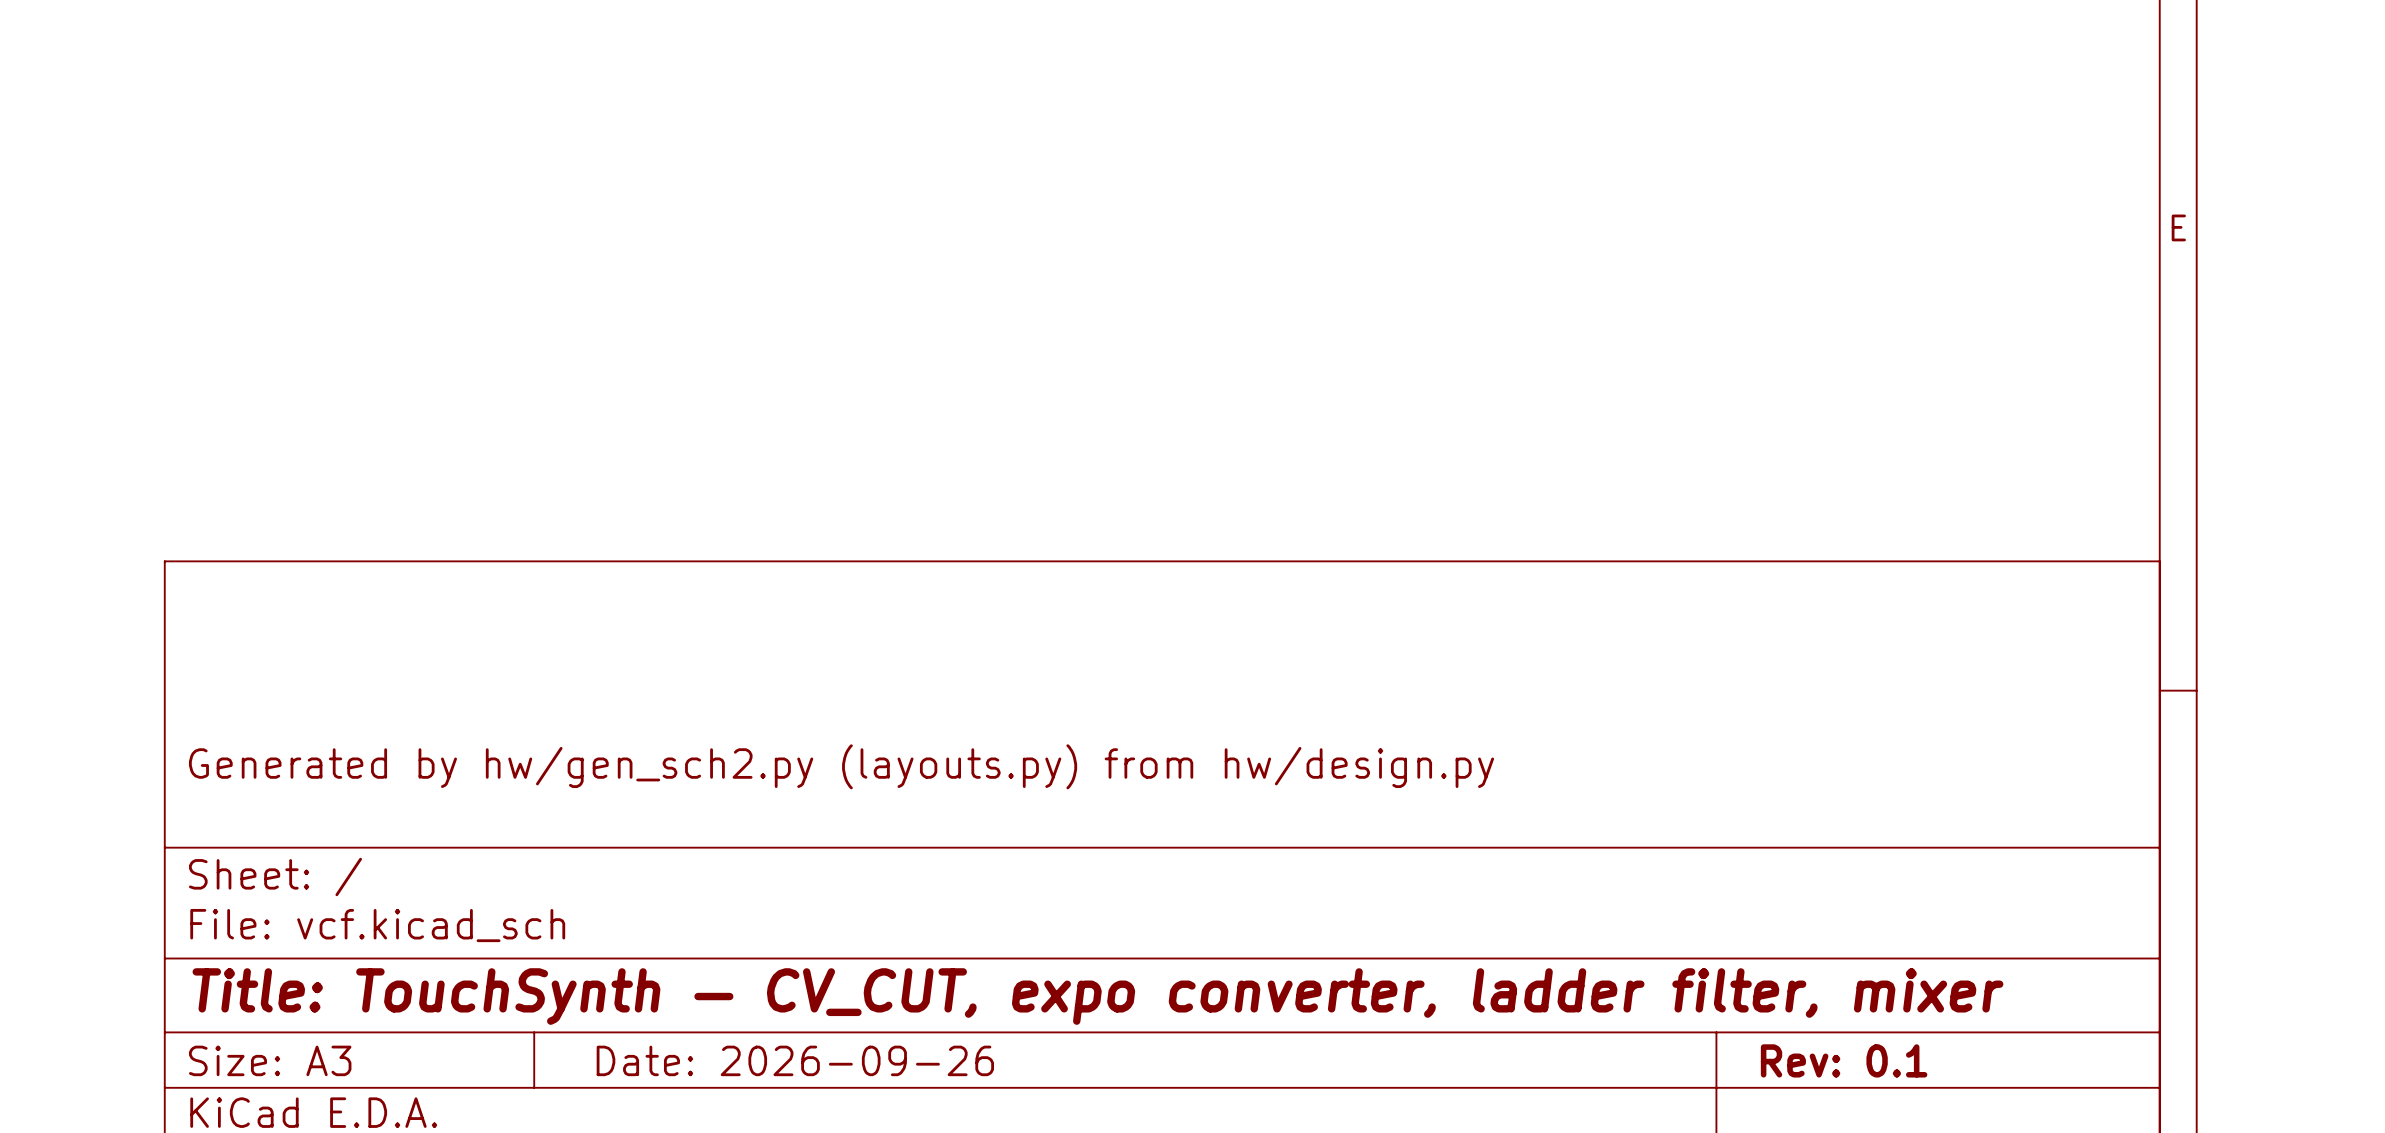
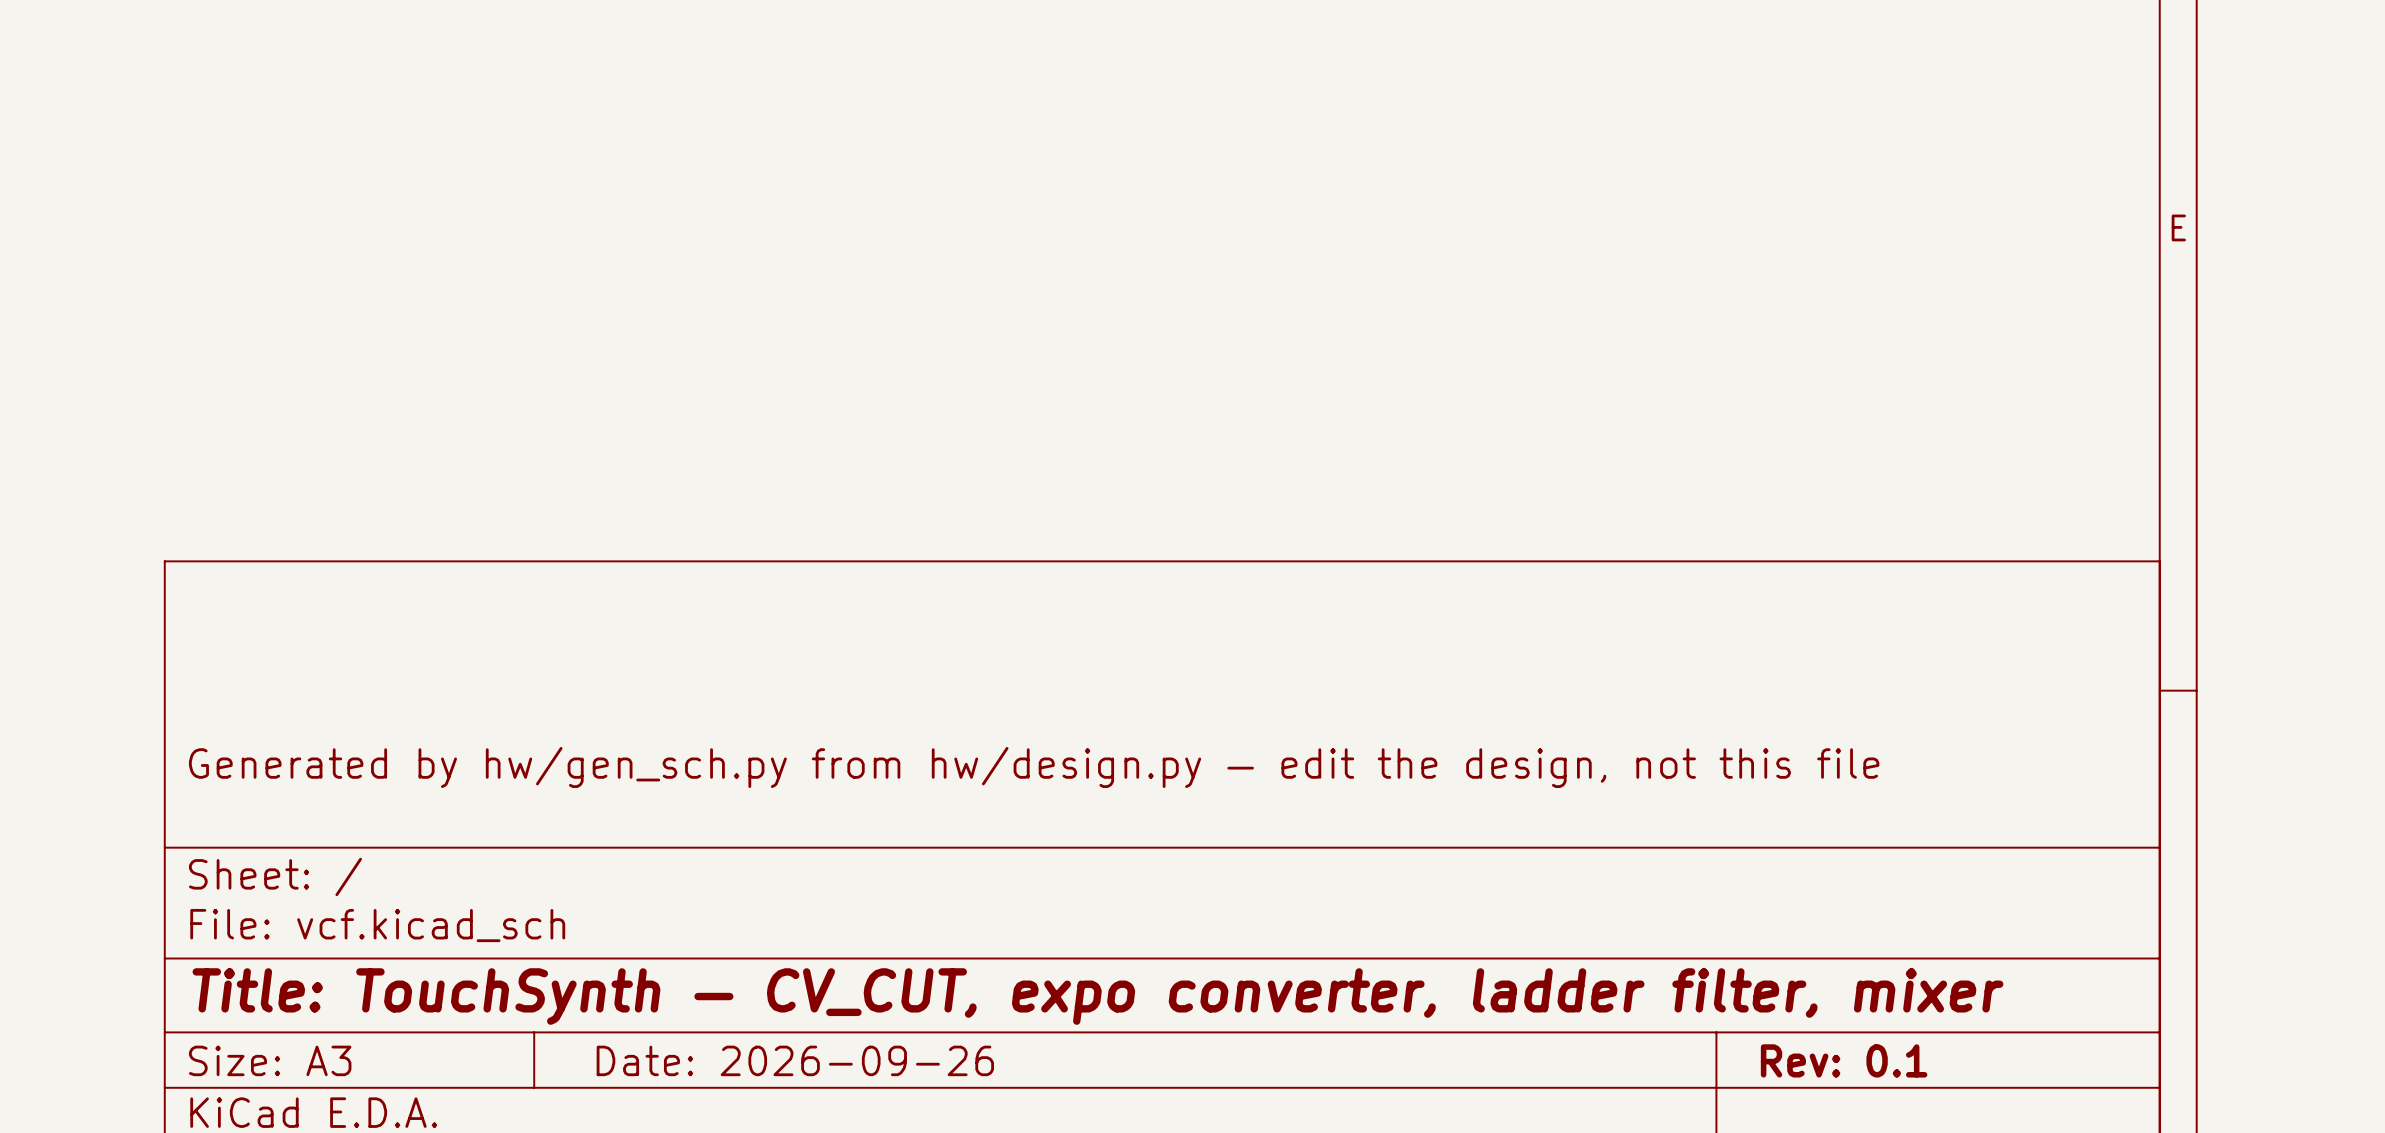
title block: Generated by hw/gen_sch2.py (layouts.py) from hw/design.py (841, 766) -> Generated by hw/gen_sch.py from hw/design.py — edit the design, not this file (1034, 767)

